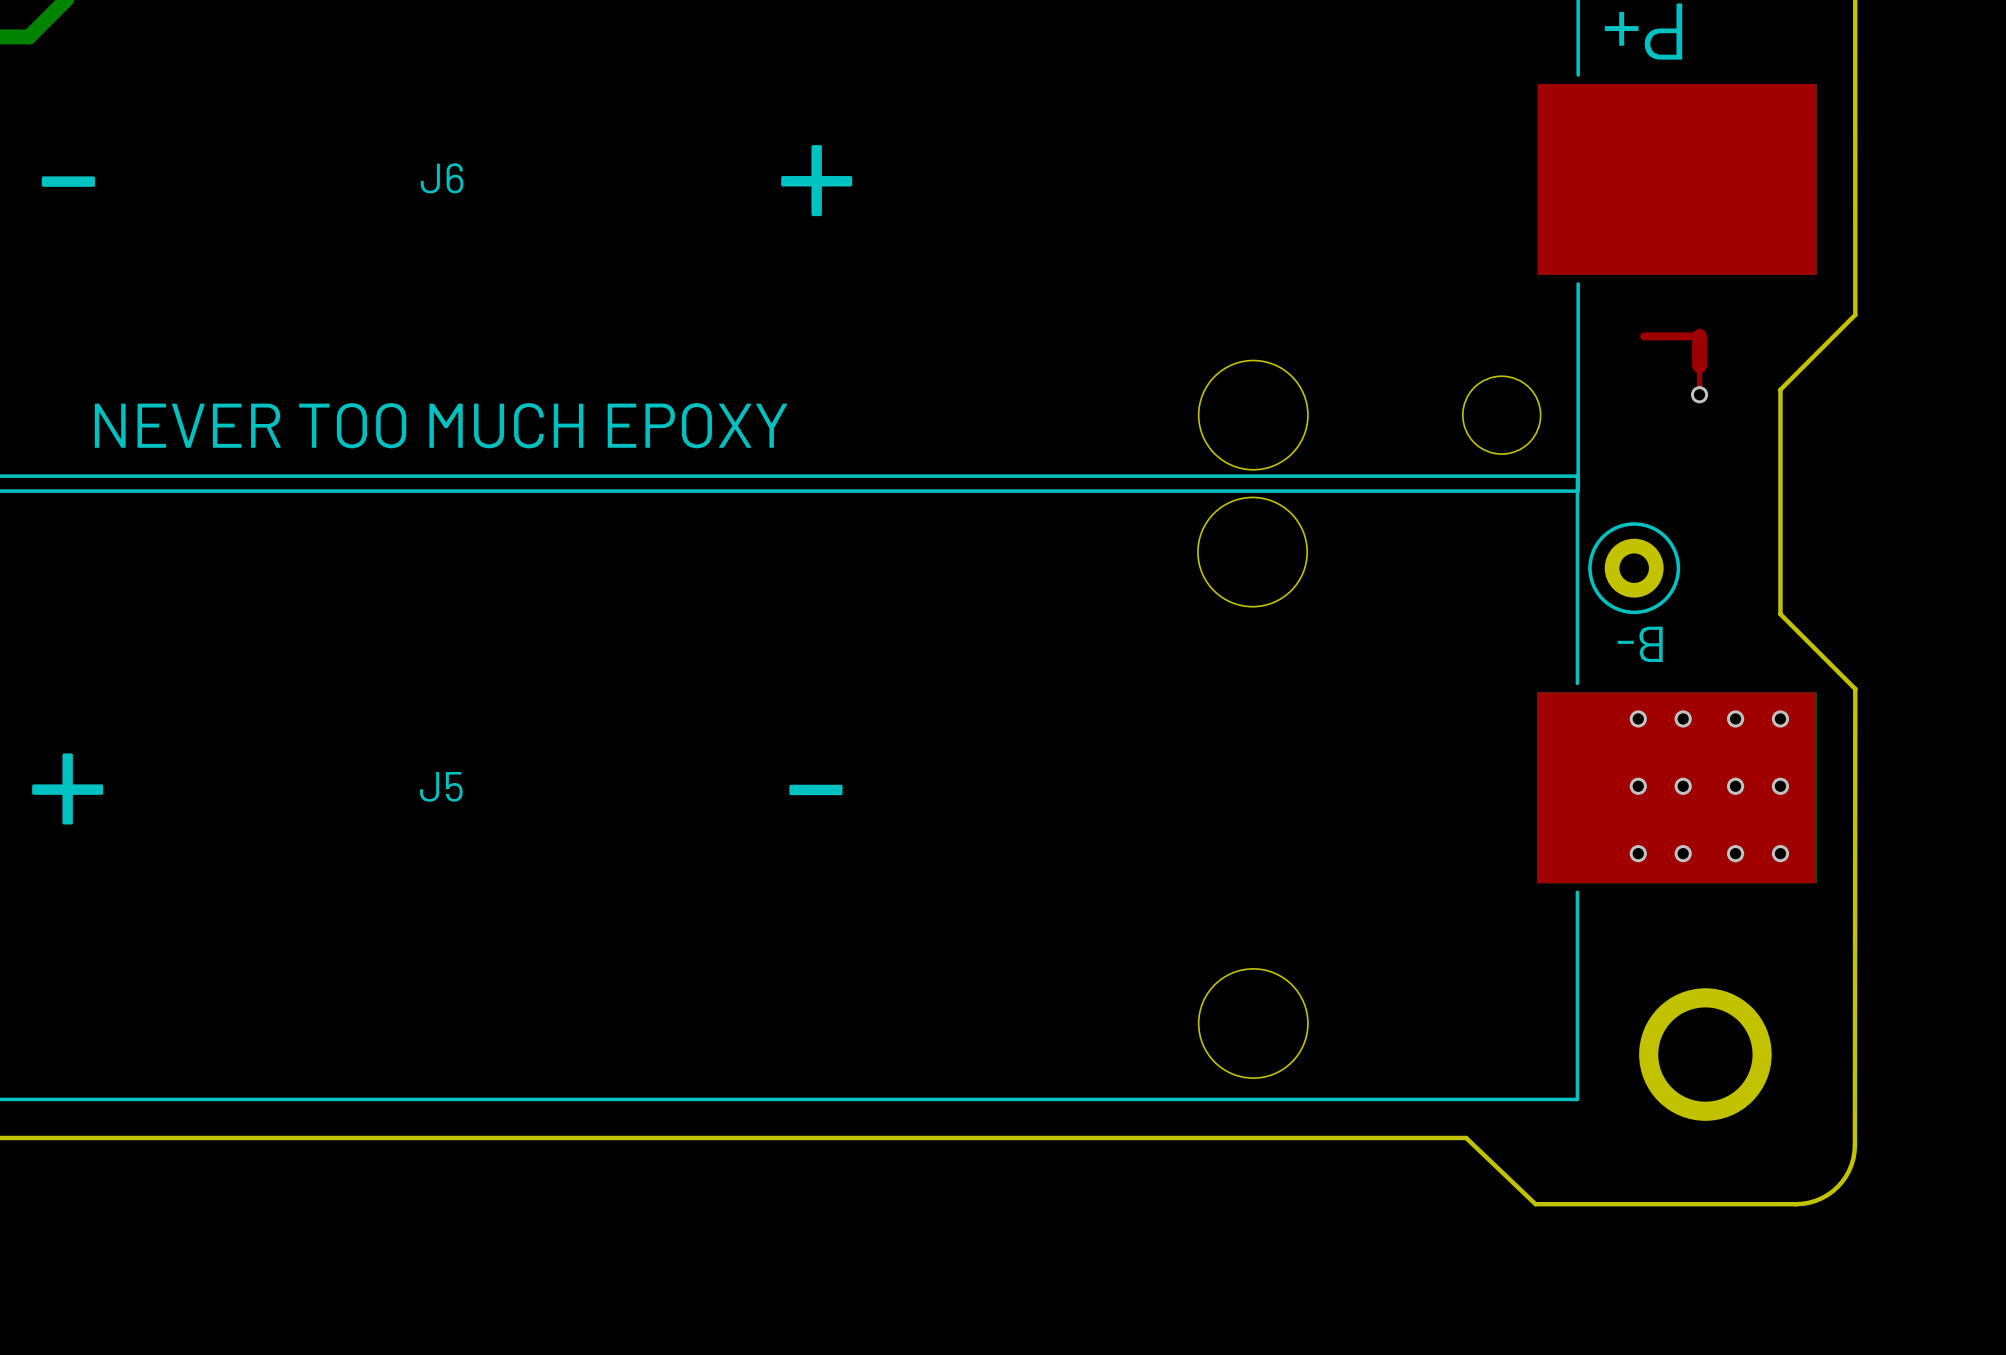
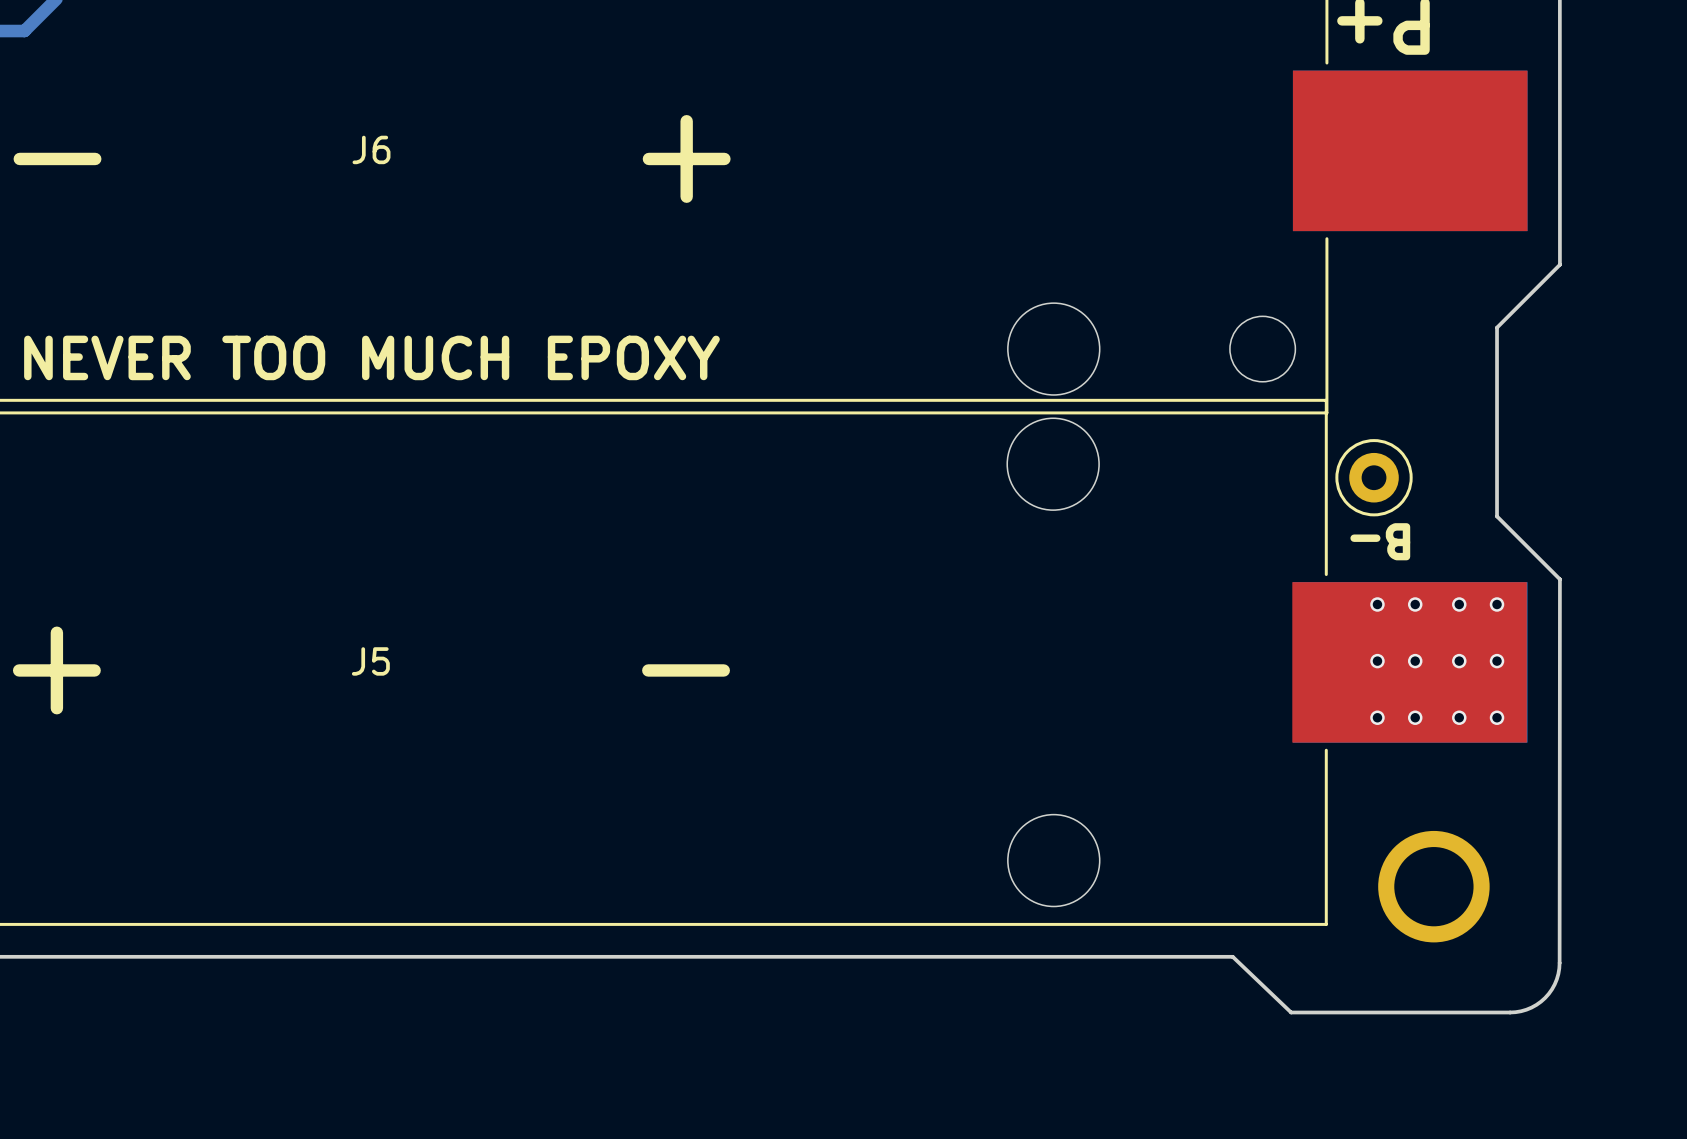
top track: (1644, 336) (1699, 336) -> none
part: (1699, 351) -> none
top track: (1699, 365) (1699, 394) -> none
via: (1699, 394) -> none

